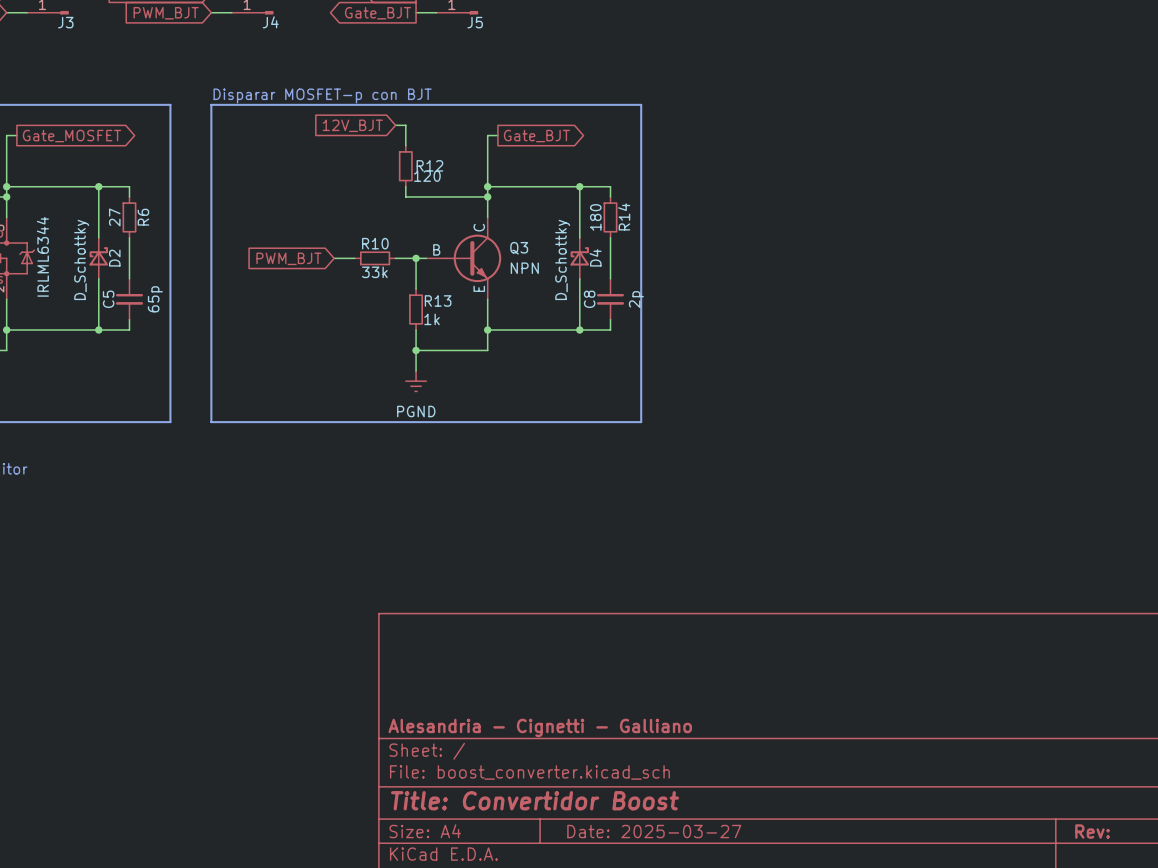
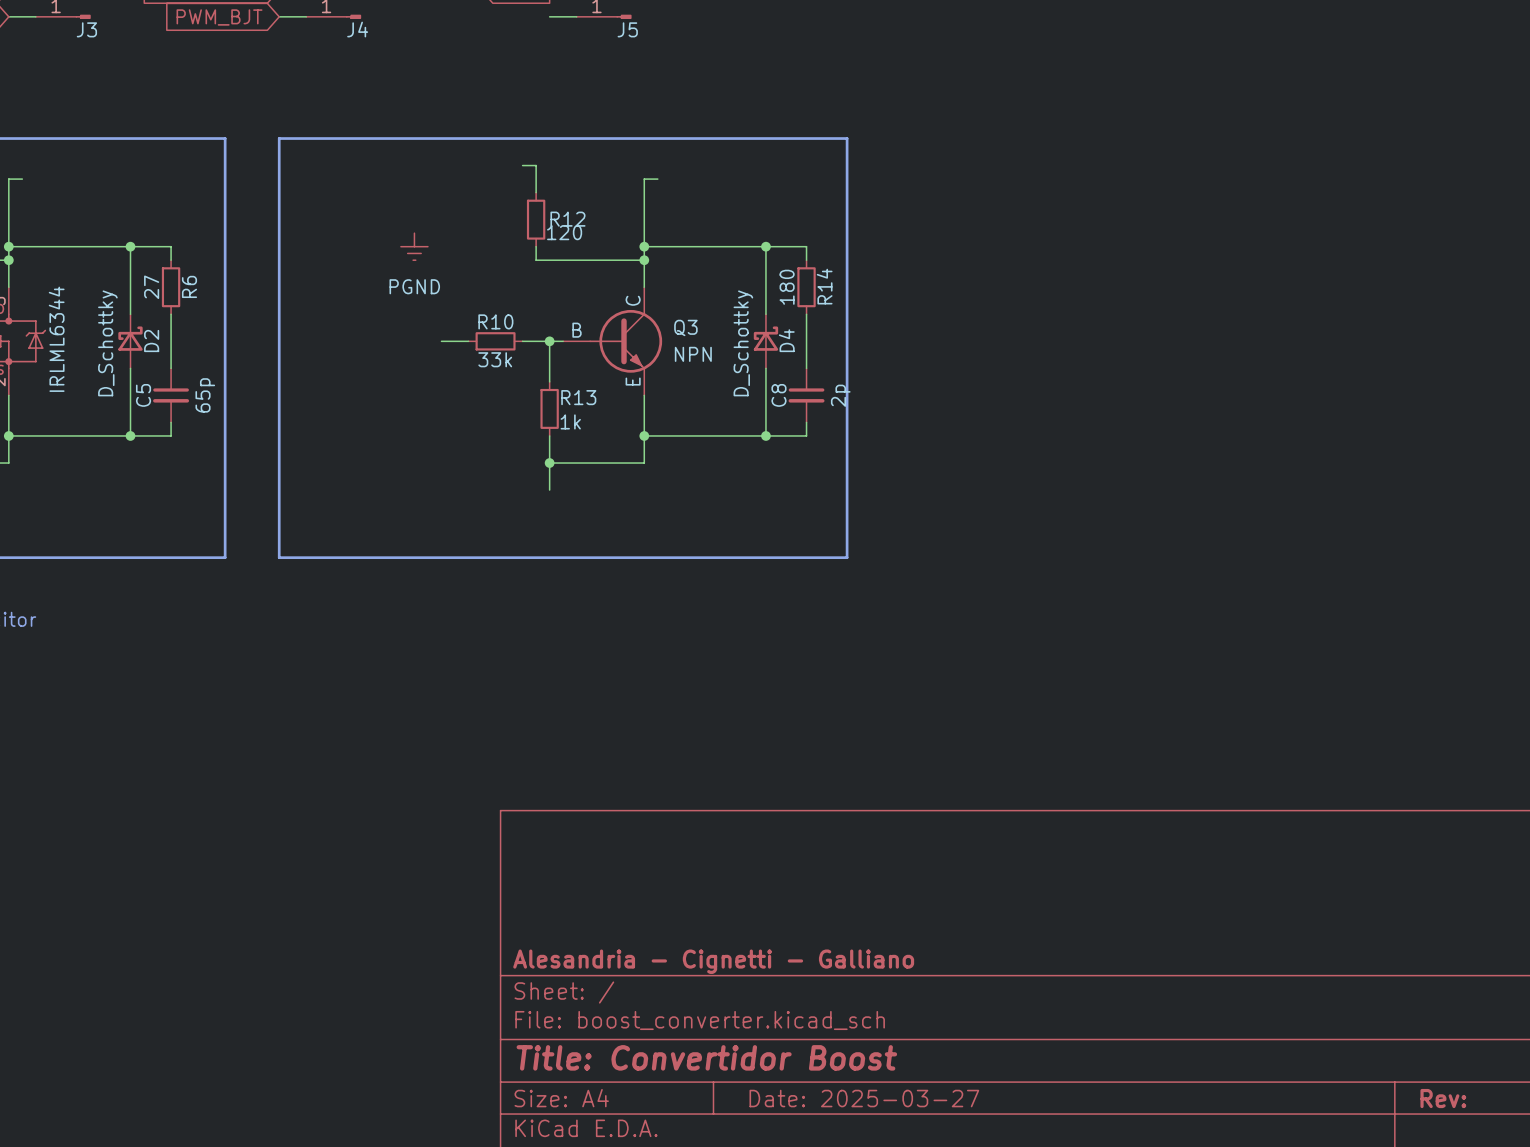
global label: Gate_BJT (378, 13) -> none
text: Disparar MOSFET-p con BJT (322, 95) -> none
global label: 12V_BJT (352, 125) -> none
global label: Gate_MOSFET (71, 136) -> none
global label: Gate_BJT (536, 136) -> none
power symbol: none -> PGND (414, 246)
global label: PWM_BJT (288, 258) -> none
power symbol: PGND (416, 381) -> none

